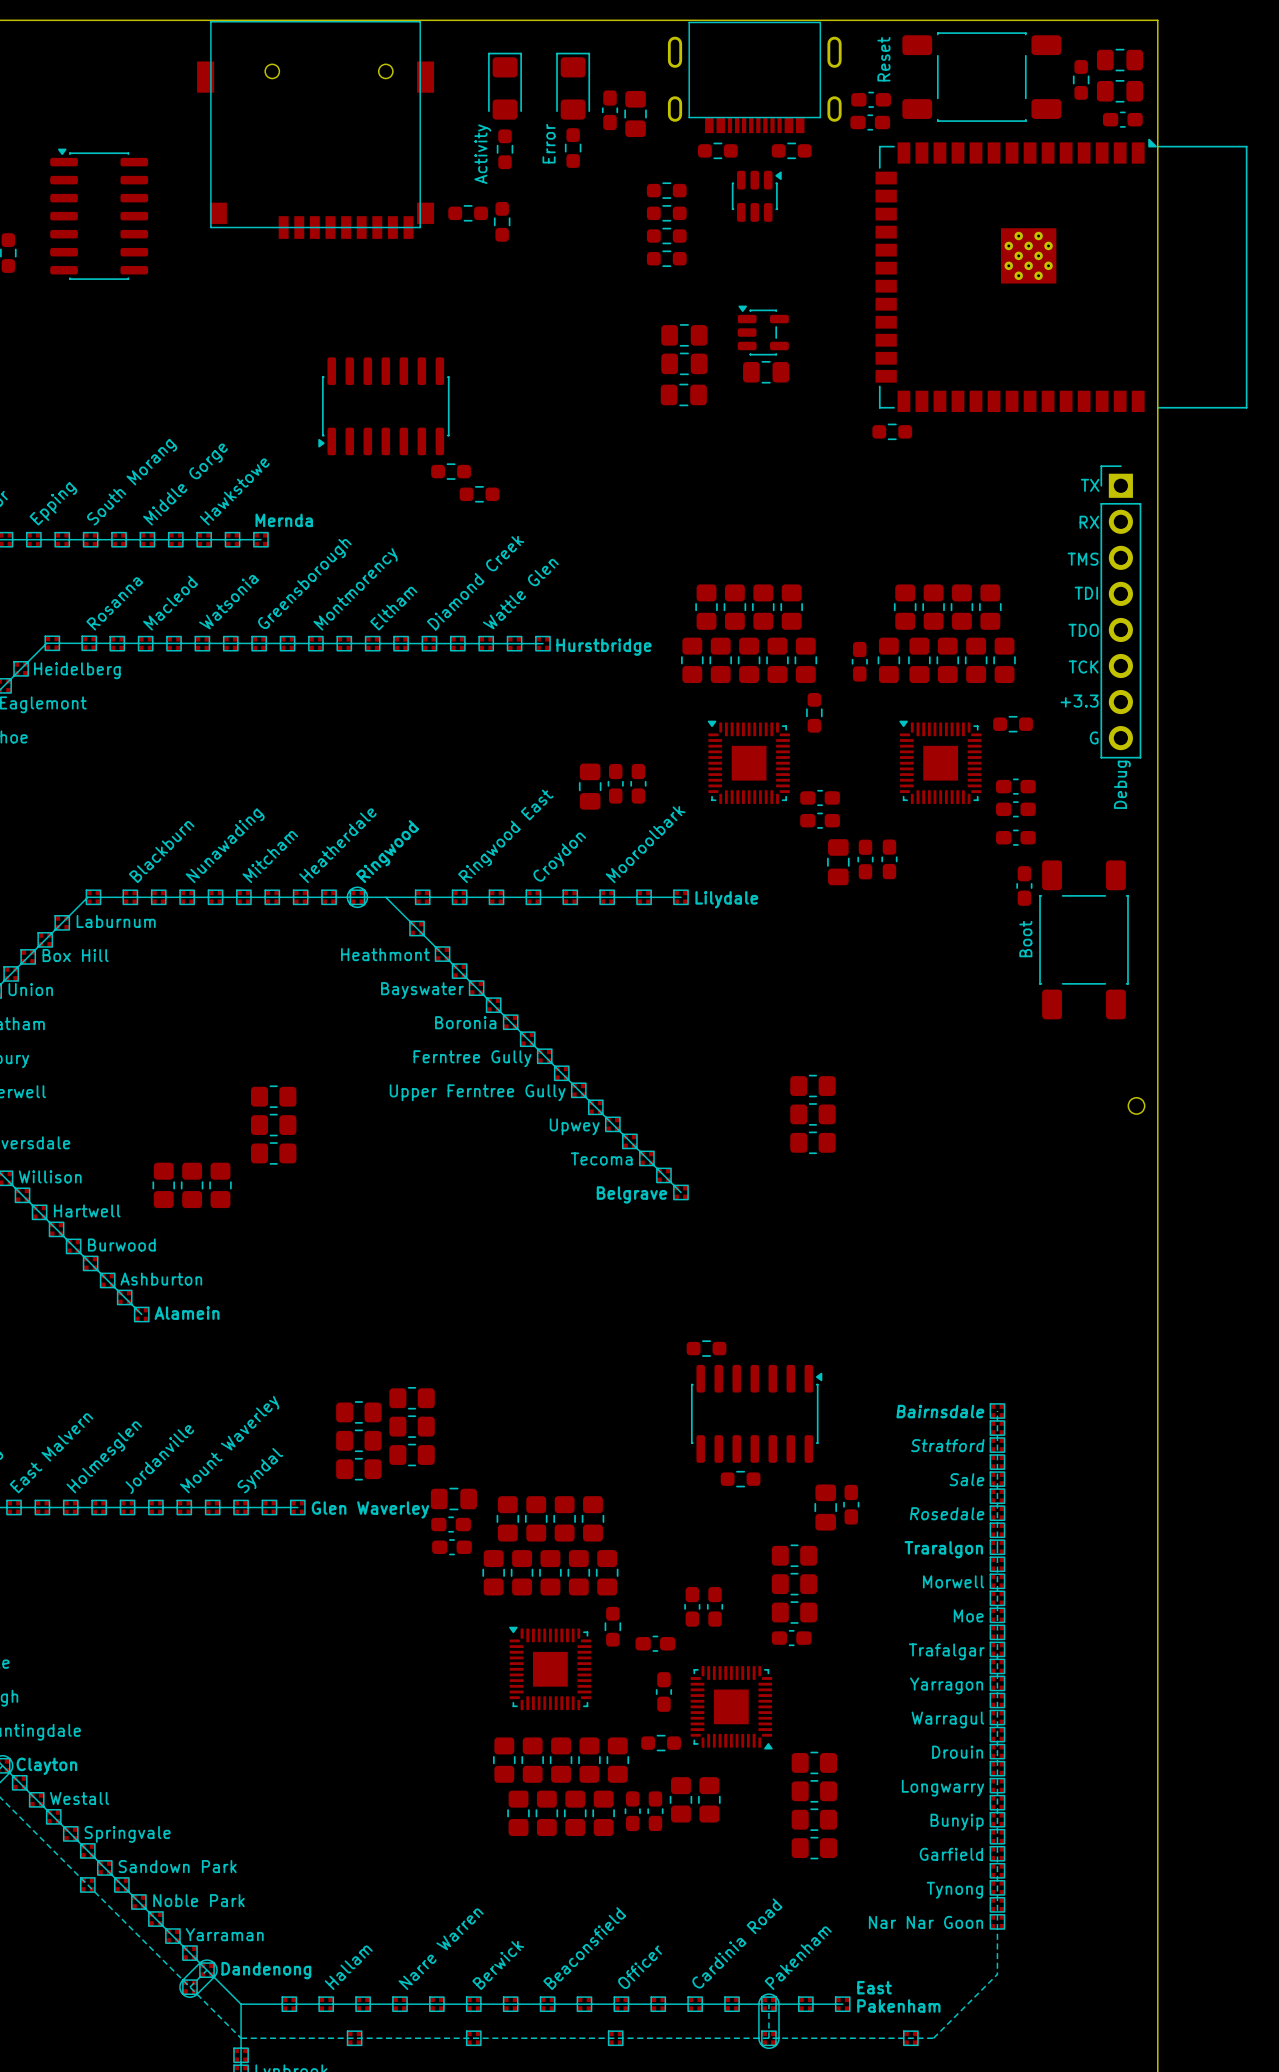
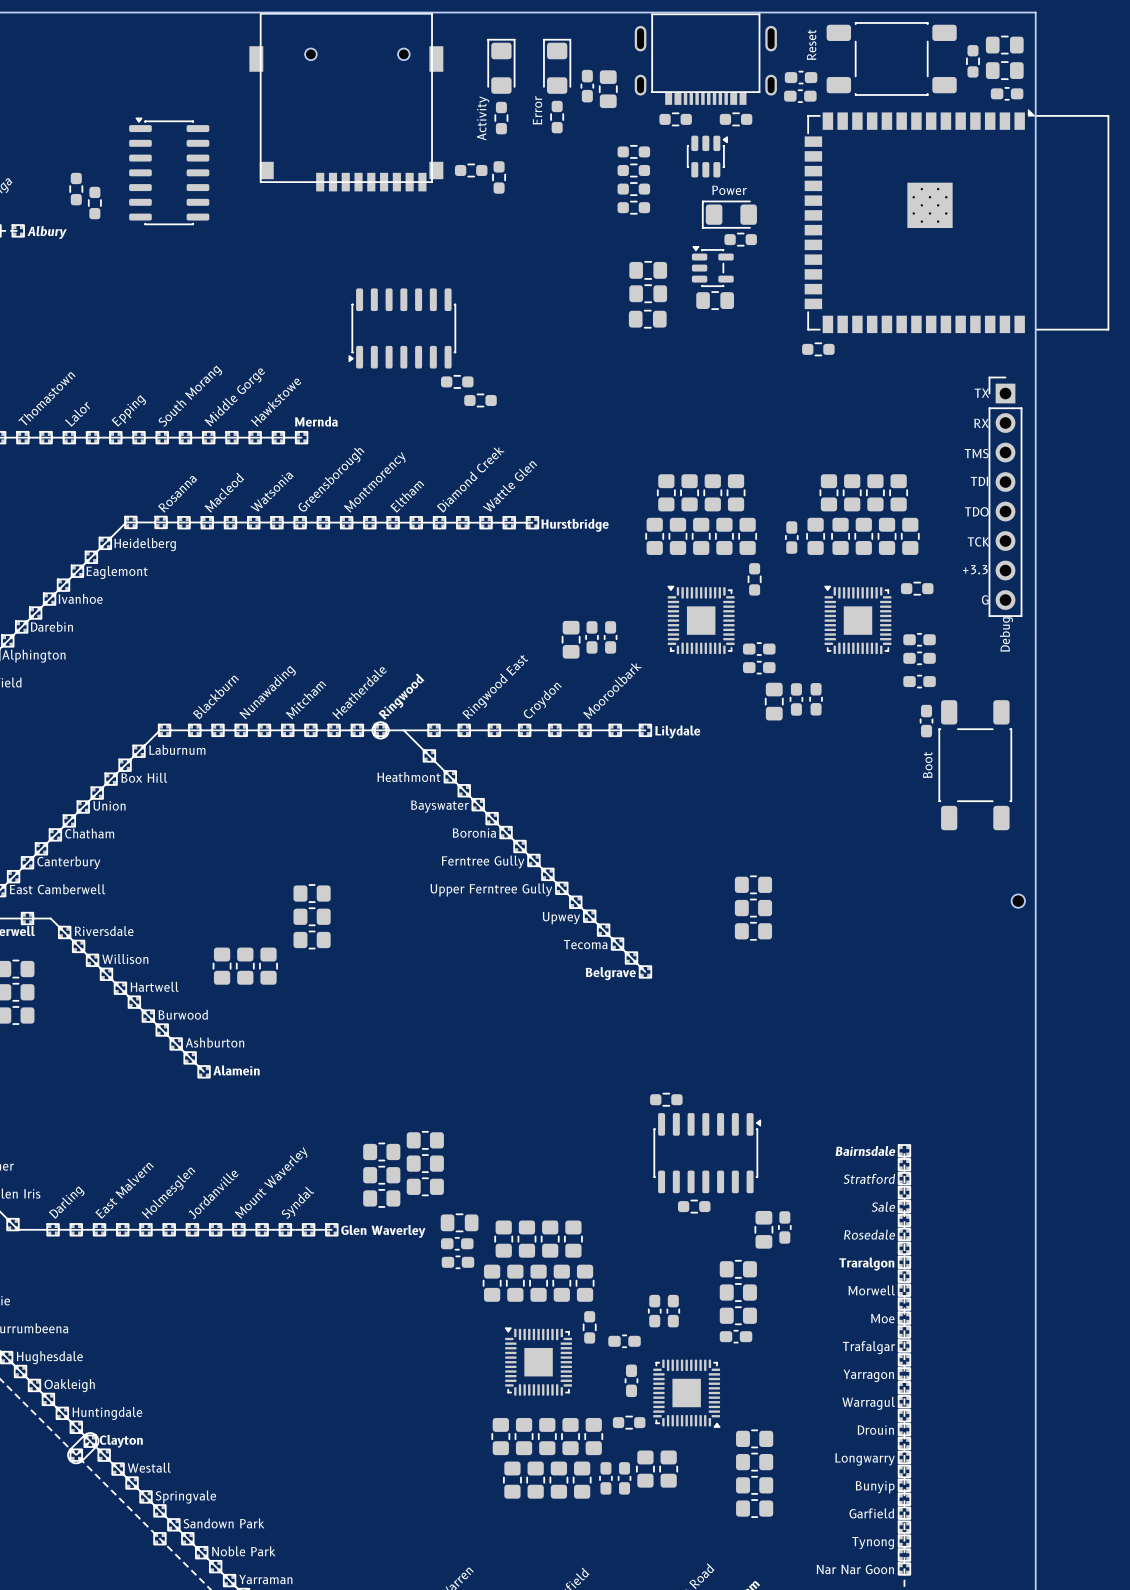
text: none -> Power (729, 190)
part: none -> (729, 214)
part: none -> (740, 239)

